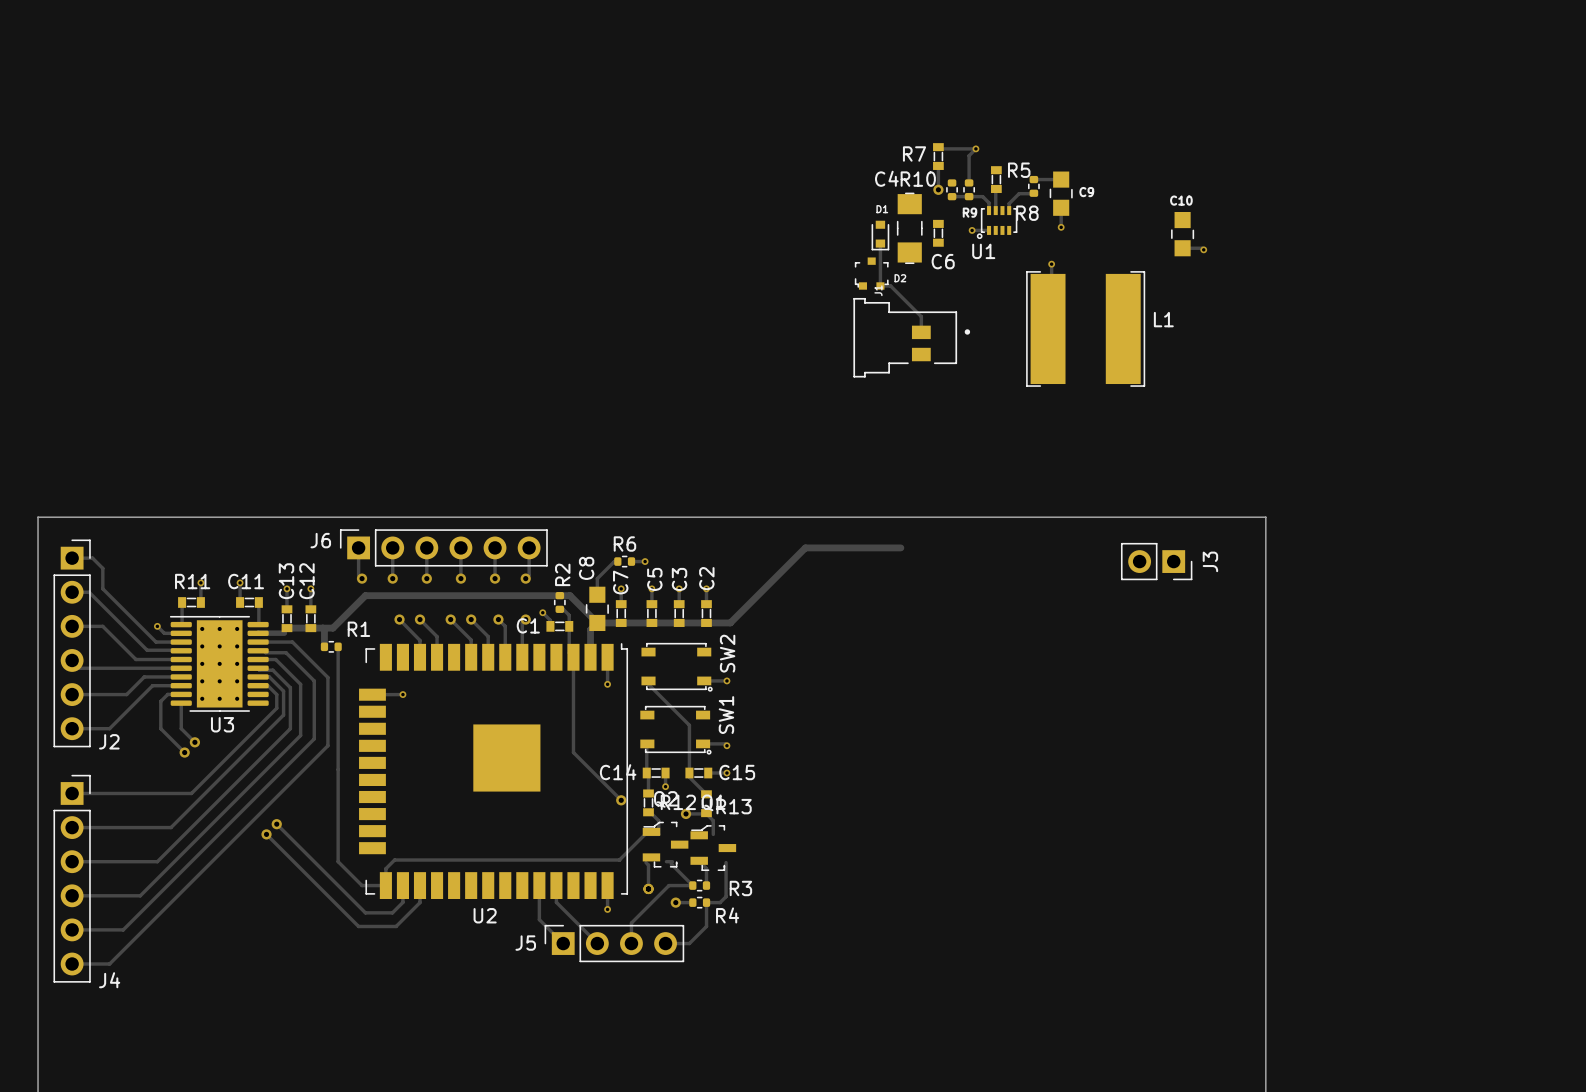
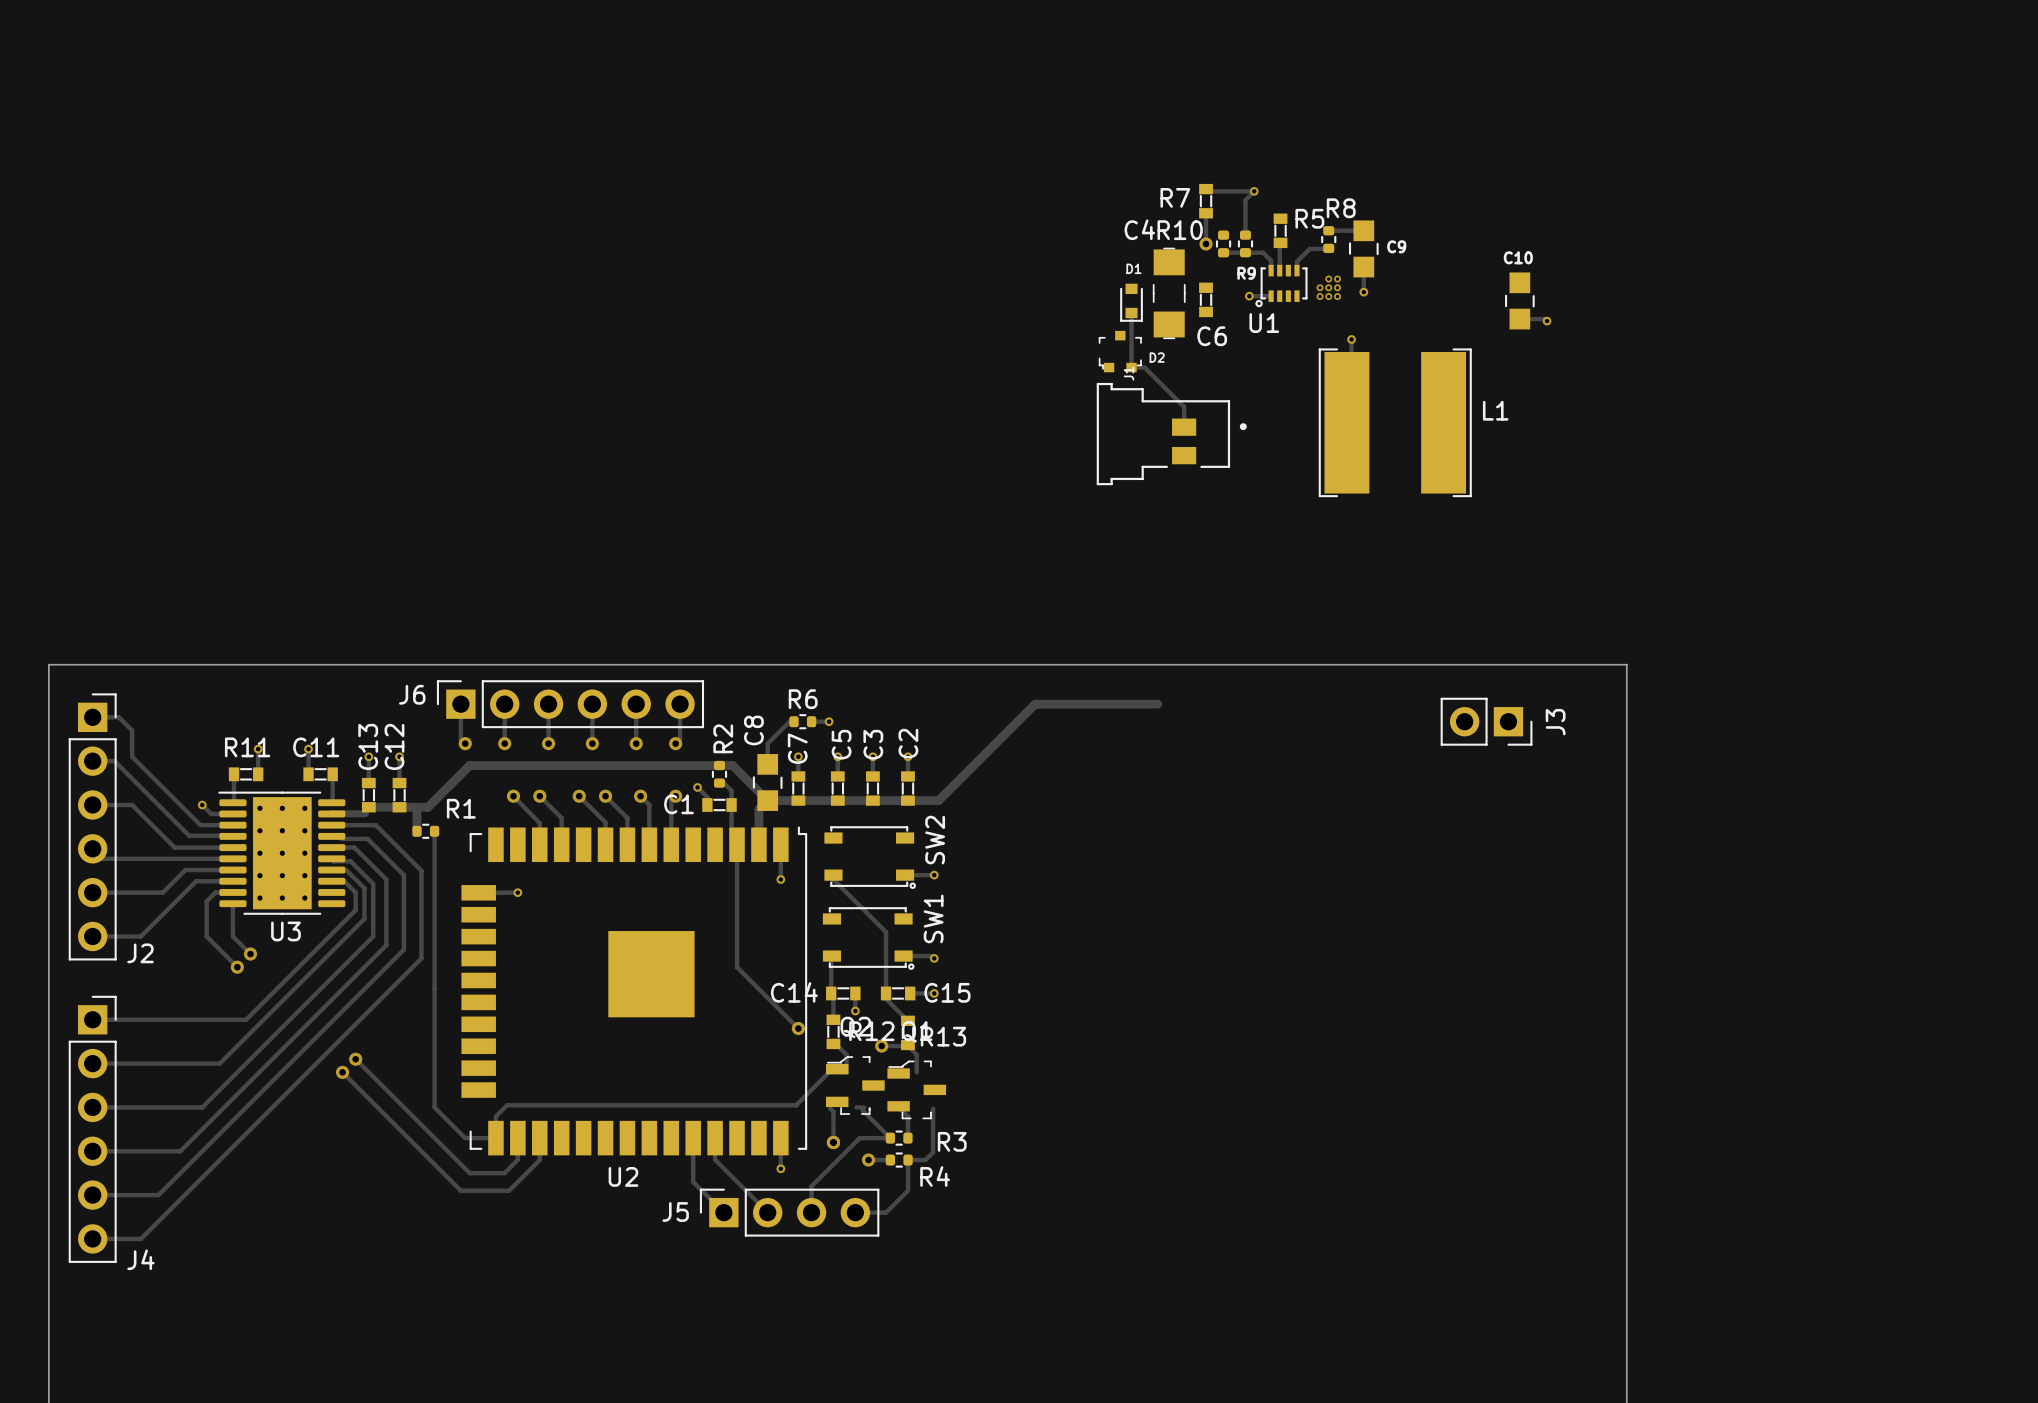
R8 name position: R8 (1027, 213) -> R8 (1341, 208)
via: none -> (1328, 279)
via: none -> (1337, 279)
via: none -> (1319, 287)
via: none -> (1328, 287)
via: none -> (1337, 287)
via: none -> (1319, 296)
via: none -> (1328, 296)
via: none -> (1337, 296)

